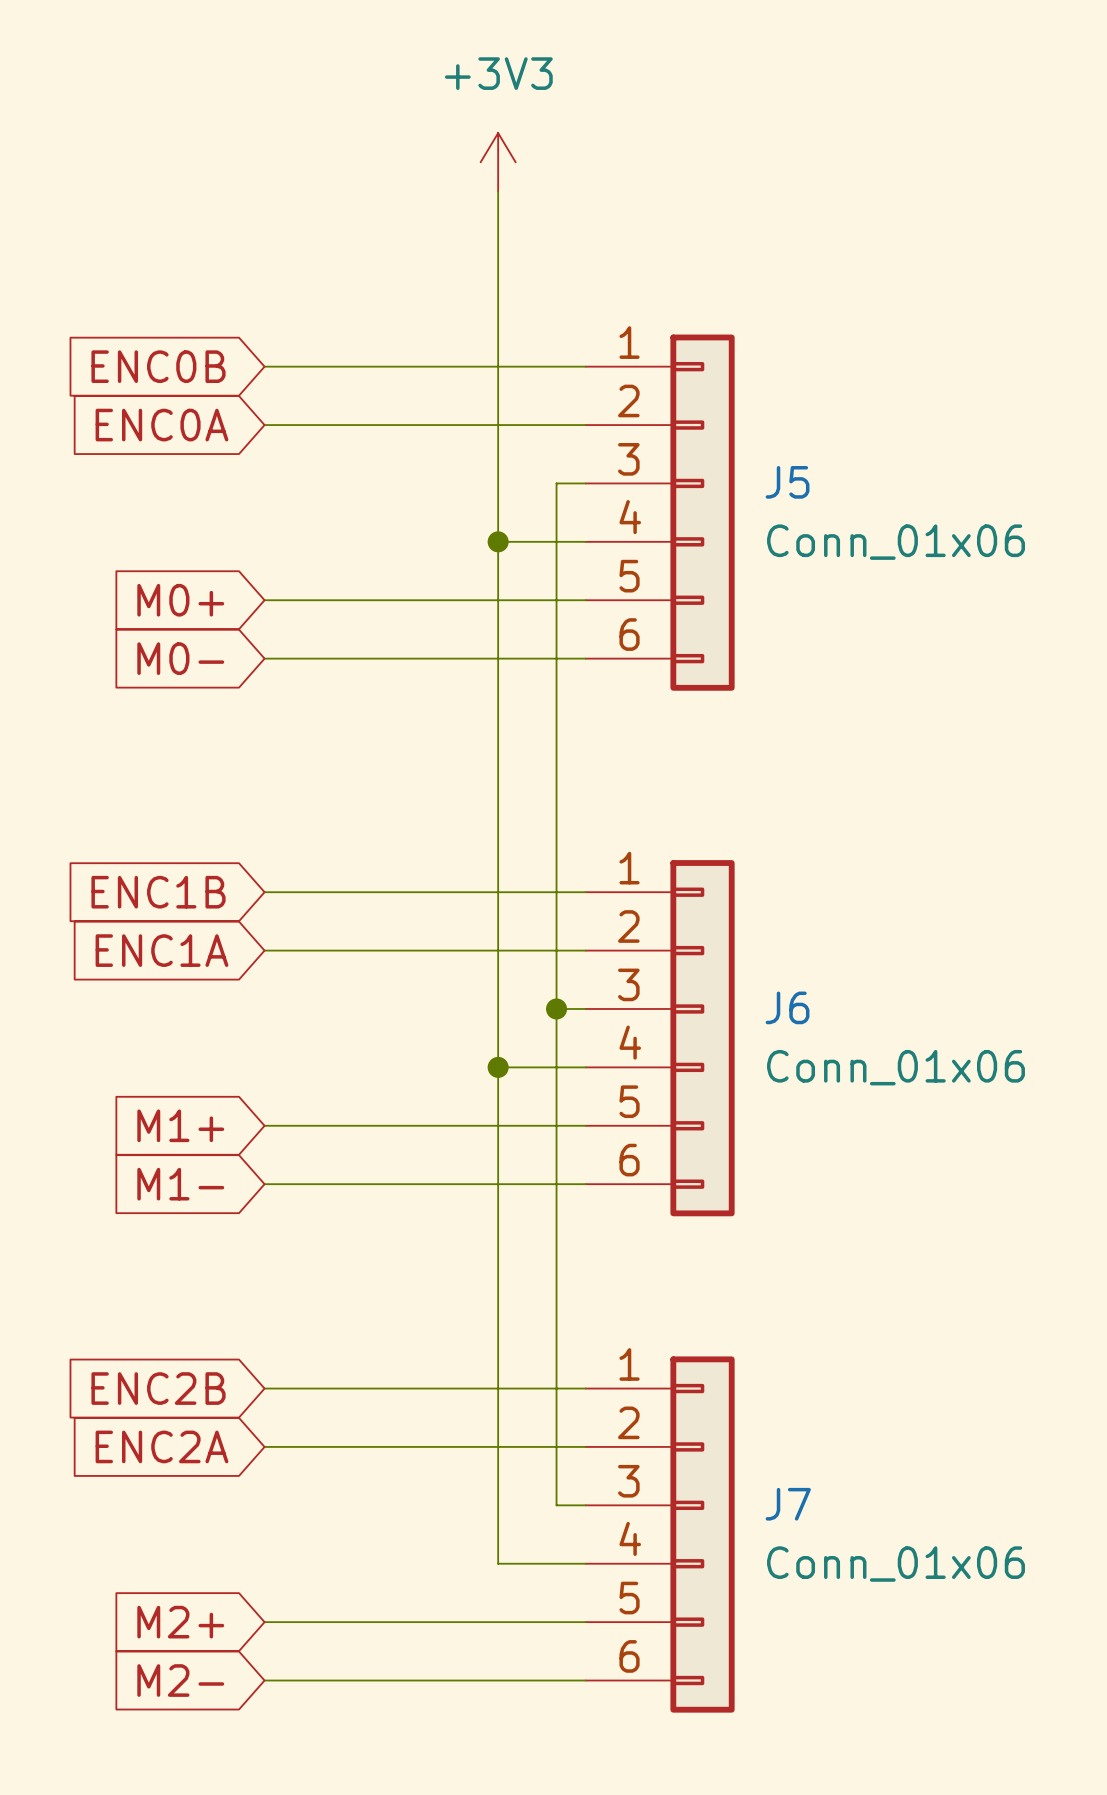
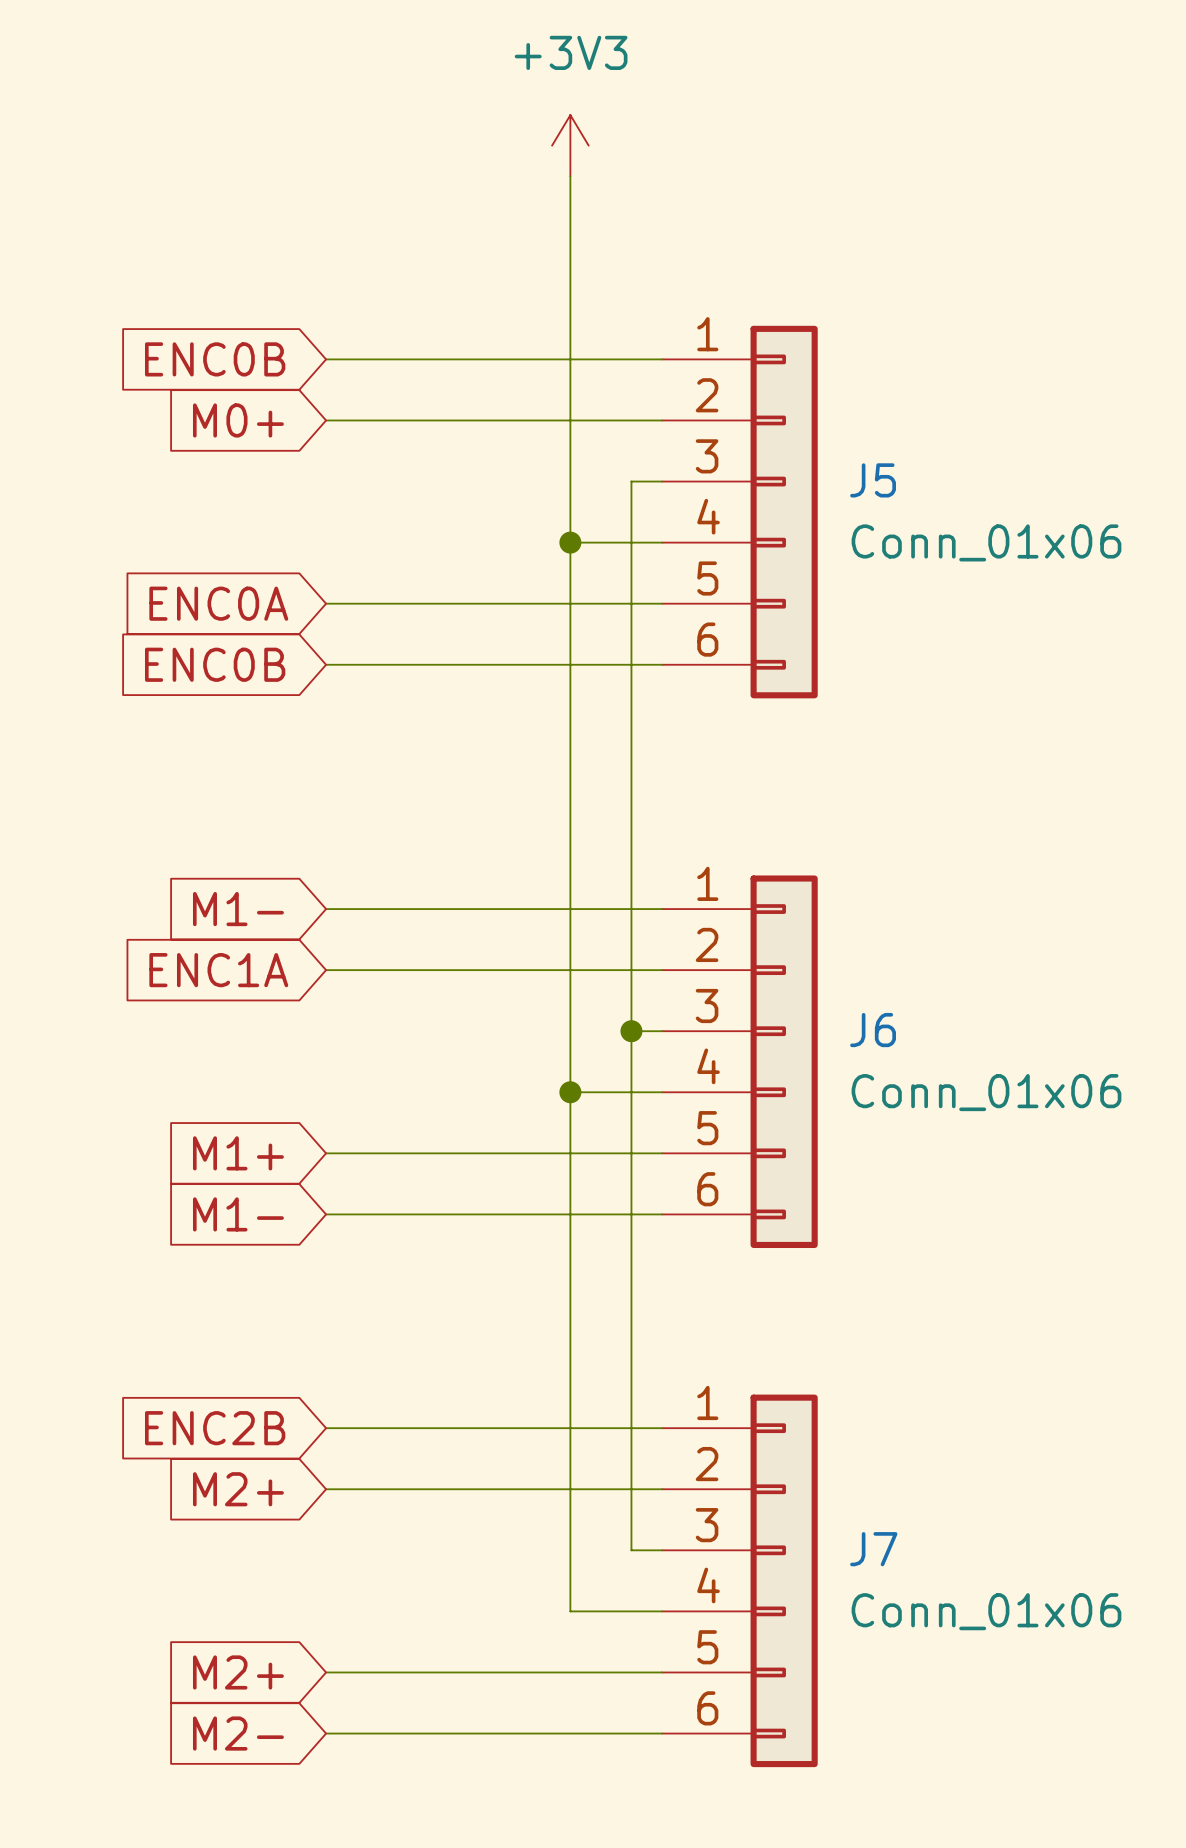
global label: ENC0A (161, 425) -> M0+ (238, 420)
global label: M0+ (180, 600) -> ENC0A (218, 603)
global label: M0- (180, 658) -> ENC0B (215, 664)
global label: ENC1B (158, 892) -> M1- (238, 909)
global label: ENC2A (161, 1446) -> M2+ (238, 1489)

